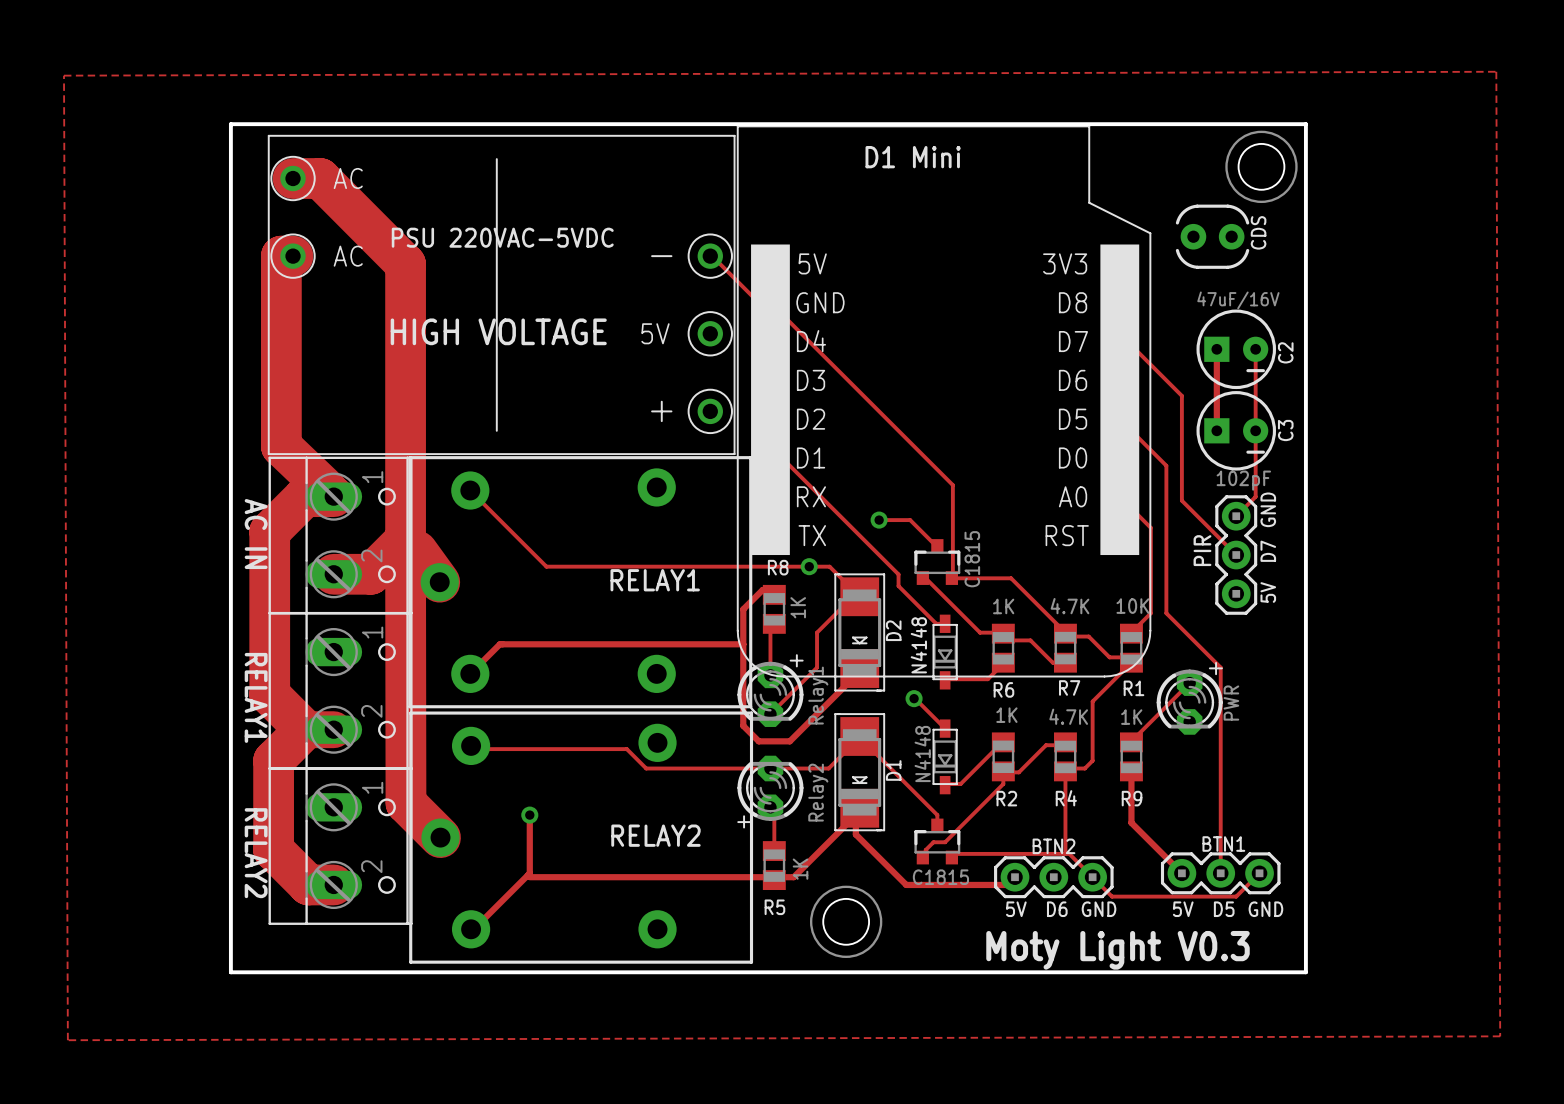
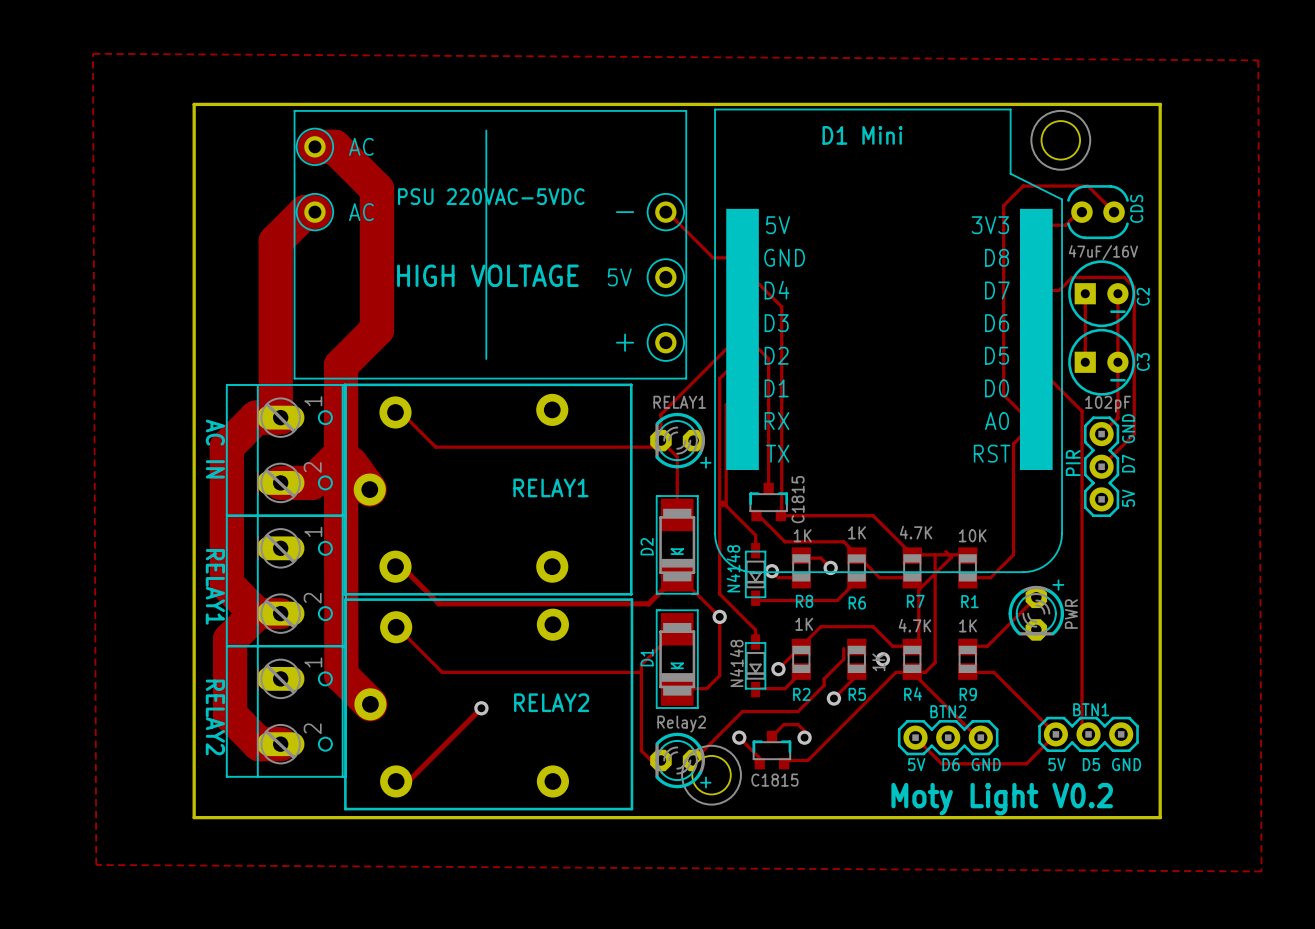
zone outline: (1496, 71) (64, 75) (67, 1040) (1500, 1036) -> (1258, 60) (92, 53) (96, 864) (1261, 871)
board edge: (1305, 124) (1305, 972) -> (1098, 104) (1160, 104) (1160, 817) (1098, 817)
track: (293, 178) (320, 178) (405, 264) (405, 434) -> (314, 146) (334, 146) (376, 189) (376, 329) (341, 365)
text position: CDS (1258, 232) -> CDS (1136, 208)
part position: (1212, 236) -> (1097, 212)
text position: PSU 220VAC-5VDC (502, 237) -> PSU 220VAC-5VDC (491, 196)
track: none -> (665, 212) (713, 257) (742, 257) (742, 267) (781, 306) (780, 515) (873, 515) (912, 554)
track: none -> (1081, 212) (1078, 212) (1065, 225) (1036, 225)
track: none -> (1114, 212) (1087, 186) (1023, 186) (1003, 205) (1003, 394) (1029, 421) (1036, 421) (1013, 443) (1013, 554) (990, 577) (967, 577) (967, 580)
track: (293, 256) (281, 256) (281, 446) (327, 490) -> (314, 212) (305, 212) (275, 241) (275, 412)
track: (710, 256) (758, 302) (770, 302) (952, 485) (951, 578) (1011, 578) (1068, 636) (1088, 636) (1109, 657) (1126, 657) -> none
part position: (501, 294) -> (490, 244)
text position: HIGH VOLTAGE (498, 331) -> HIGH VOLTAGE (487, 275)
track: (1119, 341) (1127, 341) (1181, 395) (1181, 500) (1236, 555) -> none
track: none -> (1036, 290) (1059, 290) (1072, 277) (1124, 277) (1134, 287) (1134, 434) (1101, 466)
track: (1216, 349) (1216, 430) -> (1085, 293) (1085, 362)
C2 position: (1236, 349) -> (1101, 293)
track: (1255, 349) (1255, 496) (1236, 516) -> (1117, 293) (1117, 417) (1101, 434)
part position: (944, 401) -> (888, 340)
track: (1119, 419) (1166, 465) (1166, 613) (1220, 667) (1220, 873) -> none
track: none -> (742, 355) (719, 378) (719, 594) (755, 629) (755, 642)
track: none -> (1036, 355) (1036, 365) (1082, 411) (1082, 727) (1088, 734)
C3 position: (1236, 430) -> (1101, 362)
track: (770, 457) (782, 457) (898, 574) (898, 586) (936, 623) (945, 623) (945, 621) -> none
track: none -> (742, 388) (726, 404) (726, 505) (755, 535) (755, 550)
track: (470, 490) (546, 566) (829, 566) (859, 596) (852, 596) (817, 632) (817, 667) (770, 714) -> none
track: none -> (402, 412) (435, 447) (654, 447) (660, 440)
track: (1119, 496) (1150, 527) (1150, 613) (1131, 633) -> none
text position: GND (1268, 509) -> GND (1128, 428)
track: (879, 520) (910, 520) (937, 545) -> none
via: (879, 520) -> none
track: none -> (660, 440) (660, 414) (736, 339) (749, 339) (768, 359) (768, 488)
track: none -> (660, 440) (677, 456) (677, 514)
part: none -> RELAY1 (680, 440)
text position: D7 (1268, 551) -> D7 (1128, 463)
PIR position: (1236, 555) -> (1101, 466)
part position: (937, 562) -> (768, 501)
via: (809, 566) -> none
R8 name position: R8 (778, 567) -> R8 (804, 601)
track: (922, 578) (925, 578) (980, 632) (1003, 632) -> none
text position: 5V (1268, 592) -> 5V (1128, 498)
track: (774, 594) (774, 589) (762, 589) (743, 609) (743, 725) (758, 741) (789, 741) (859, 671) (859, 668) -> none
R1 value position: 10K (1132, 606) -> 10K (972, 535)
R8 value rotation: 0° (798, 607) -> 90° clockwise (802, 535)
R8 value position: 1K (798, 607) -> 1K (802, 535)
R8 position: (774, 609) -> (801, 567)
track: none -> (756, 515) (784, 541) (843, 541) (879, 577) (912, 577) (912, 580)
track: (774, 623) (770, 620) (770, 675) -> none
D2 name position: D2 (893, 630) -> D2 (647, 546)
D2 position: (859, 632) -> (677, 544)
track: (1003, 632) (1011, 640) (1030, 640) (1052, 662) (1065, 662) (1065, 659) -> none
track: (743, 644) (499, 644) (470, 673) -> none
R6 position: (1003, 648) -> (856, 567)
R7 position: (1065, 648) -> (912, 567)
R1 position: (1131, 648) -> (967, 567)
N4148 position: (945, 652) -> (755, 574)
track: none -> (912, 554) (967, 555)
track: none -> (935, 554) (935, 662) (925, 672) (895, 672) (807, 760) (784, 760) (784, 763)
track: none -> (801, 555) (803, 558) (820, 558) (830, 567)
track: (1003, 662) (987, 679) (945, 680) -> none
track: none -> (399, 567) (402, 566) (438, 603) (648, 603) (677, 575) (677, 584) (687, 584) (719, 616) (719, 675) (706, 688) (677, 688)
via: none -> (830, 567)
track: none -> (771, 571) (778, 577) (801, 577) (801, 580)
track: (1189, 683) (1131, 742) -> none
track: none -> (856, 580) (837, 600) (755, 600) (755, 598)
part: Relay1 (770, 690) -> none
track: (914, 698) (945, 728) -> none
via position: (914, 698) -> (771, 571)
part position: (1189, 698) -> (1036, 610)
track: none -> (1036, 597) (987, 646) (967, 647)
via: none -> (719, 616)
track: (859, 737) (937, 815) (937, 825) -> none
track: (859, 737) (828, 768) (646, 768) (626, 749) (471, 749) (471, 745) -> none
track: (1003, 742) (960, 784) (945, 785) -> none
track: (1065, 745) (1065, 742) (1062, 745) (1046, 745) (1018, 772) (1003, 772) -> none
track: none -> (677, 629) (641, 665) (641, 750) (651, 760) (660, 760)
track: none -> (402, 631) (442, 672) (641, 672)
part position: (945, 756) -> (755, 665)
R2 position: (1003, 756) -> (801, 659)
R4 position: (1065, 756) -> (912, 659)
R9 position: (1131, 756) -> (967, 659)
track: (1065, 768) (1065, 853) -> (895, 646) (892, 646) (873, 626) (820, 626) (778, 669)
D1 name position: D1 (893, 770) -> D1 (647, 657)
track: (1131, 771) (1131, 822) (1181, 873) -> none
D1 position: (859, 772) -> (677, 659)
via: none -> (882, 659)
part rotation: 0° (770, 792) -> 90° counterclockwise (680, 760)
part position: (770, 792) -> (680, 760)
via: none -> (778, 669)
track: none -> (801, 671) (784, 688) (755, 689)
R2 name position: R2 (1006, 798) -> R2 (801, 694)
track: none -> (856, 671) (856, 675) (833, 698)
track: none -> (912, 671) (977, 737) (980, 737)
track: none -> (967, 671) (993, 672) (1055, 734) (1026, 763) (941, 763) (915, 737)
track: (770, 807) (774, 815) (774, 851) -> none
track: (980, 807) (945, 842) (933, 842) (925, 850) (922, 857) -> (824, 678) (824, 685) (798, 711) (742, 711) (693, 760)
track: (529, 815) (529, 873) (473, 929) (471, 929) -> none
via position: (529, 815) -> (481, 708)
track: (855, 815) (793, 877) (529, 877) (527, 875) -> none
track: (855, 815) (855, 834) (906, 884) (1007, 884) (1015, 877) -> none
via: none -> (833, 698)
part position: (937, 841) -> (771, 750)
track: none -> (481, 708) (406, 783) (399, 783) (402, 785)
track: (951, 857) (952, 853) (1069, 853) (1112, 896) (1236, 896) (1259, 873) -> none
R5 position: (774, 865) -> (856, 659)
part position: (1220, 873) -> (1088, 734)
track: none -> (771, 736) (783, 724) (798, 724) (804, 731) (804, 737)
track: none -> (739, 737) (758, 757) (759, 763)
via: none -> (739, 737)
via: none -> (804, 737)
BTN2 position: (1053, 877) -> (948, 737)
text: 5V (1016, 909) -> none
text position: D6 (1057, 909) -> D6 (951, 764)
text: GND (1099, 909) -> 5V (916, 764)
text: none -> GND (986, 764)
text: 5V (1183, 909) -> none
text position: D5 (1224, 909) -> D5 (1091, 764)
text: GND (1265, 909) -> 5V (1057, 764)
text: none -> GND (1126, 764)
text: Moty Light V0.3 (1118, 950) -> Moty Light V0.2 (1002, 799)

